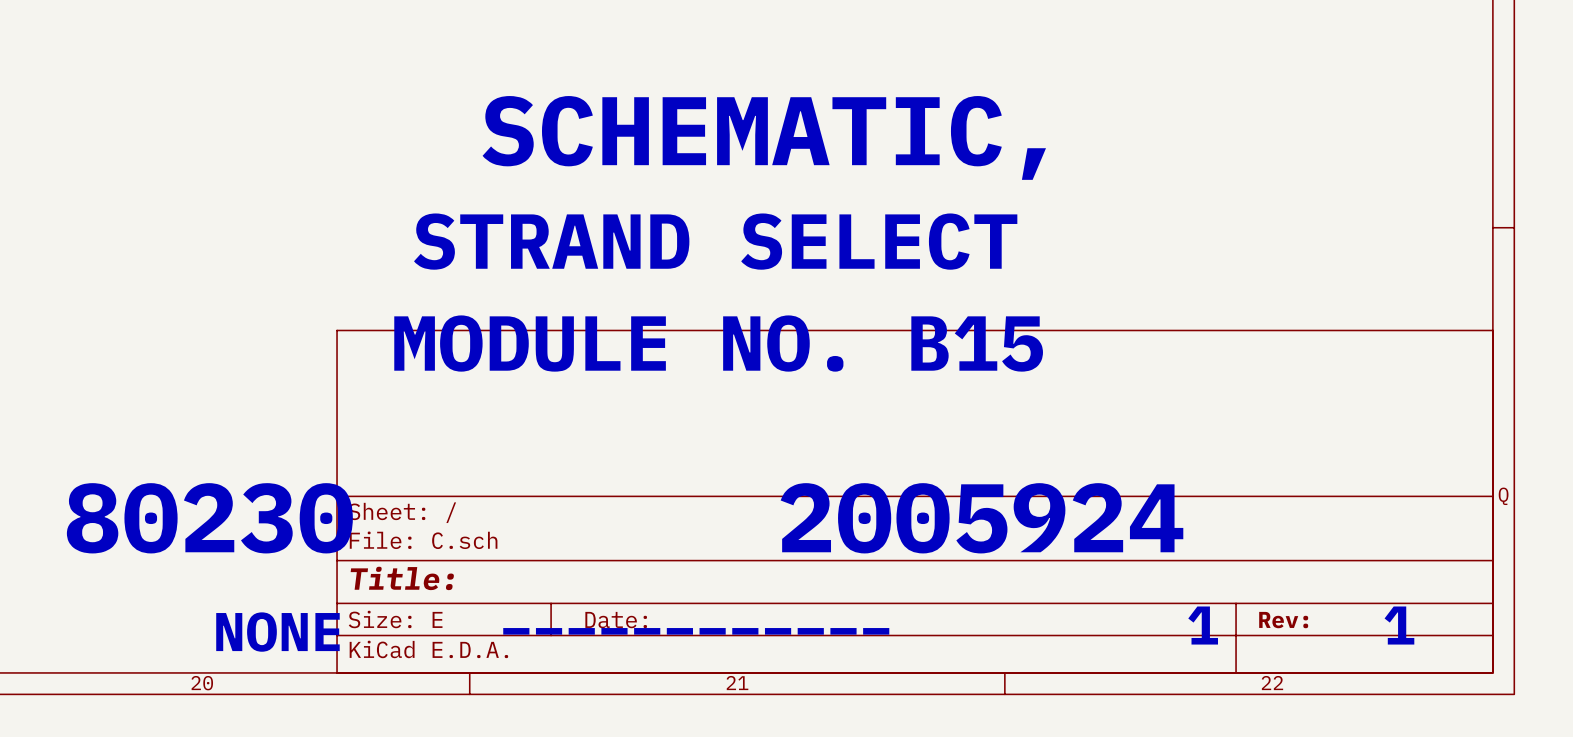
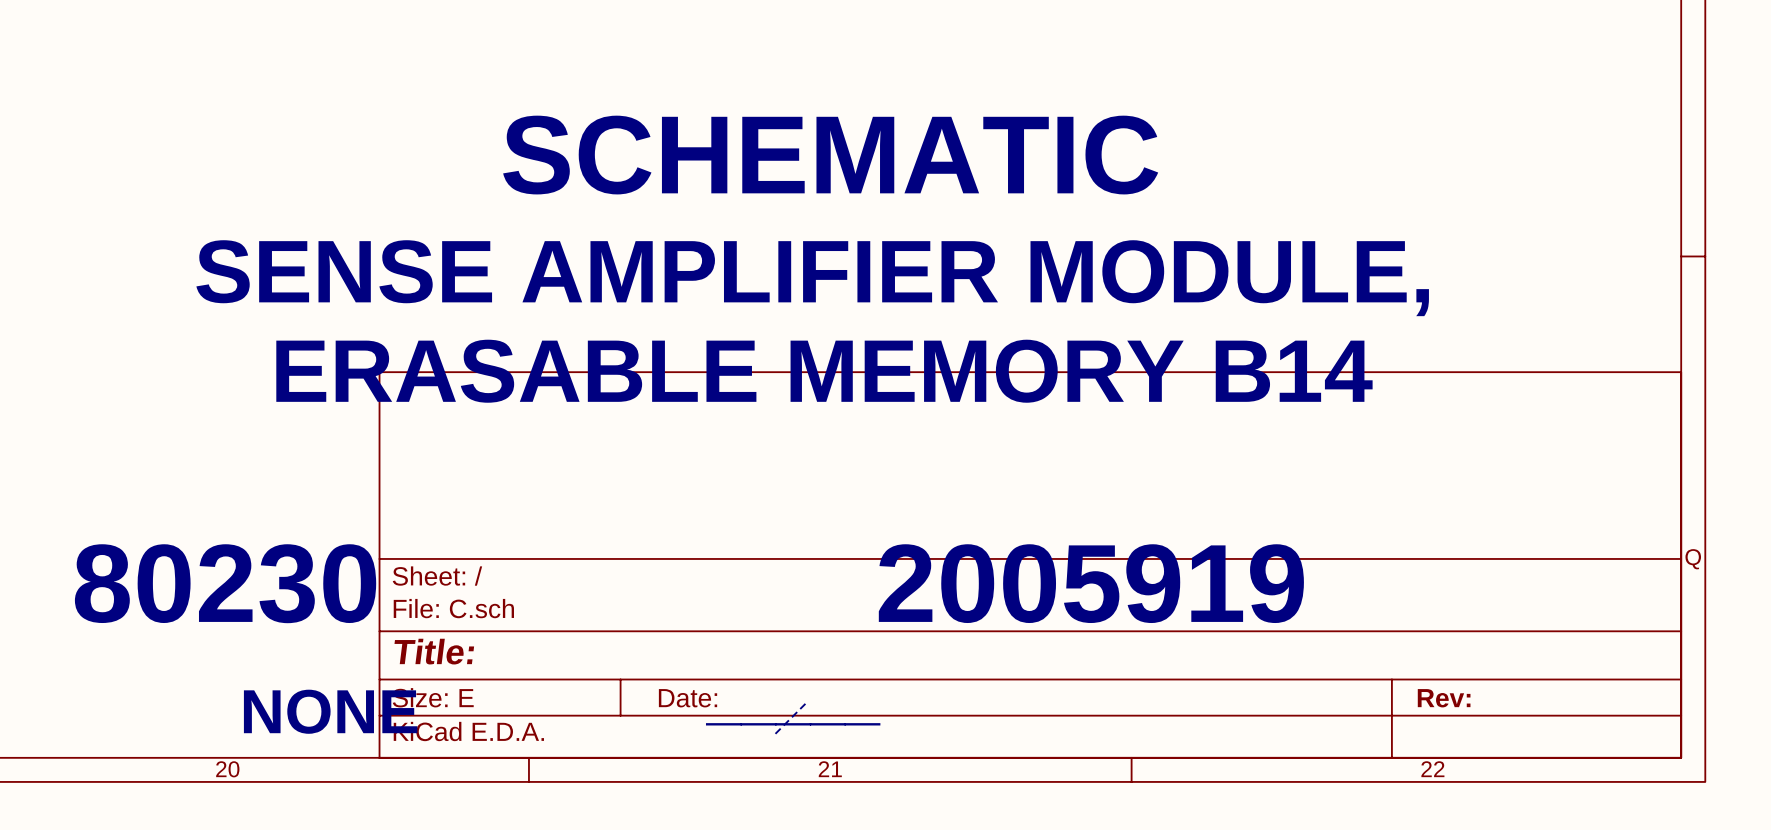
text: SCHEMATIC, (764, 137) -> SCHEMATIC (830, 155)
text: STRAND SELECT (715, 241) -> none
text: none -> SENSE AMPLIFIER MODULE, (812, 278)
text: none -> ERASABLE MEMORY B14 (824, 371)
text: MODULE NO. B15 (718, 343) -> none
text: 2005924 (981, 518) -> 2005919 (1091, 583)
line: none -> (806, 703) (775, 733)
text: 1 1 (1301, 625) -> none
text: ____________ (696, 631) -> none
text: none -> _____ (793, 724)

